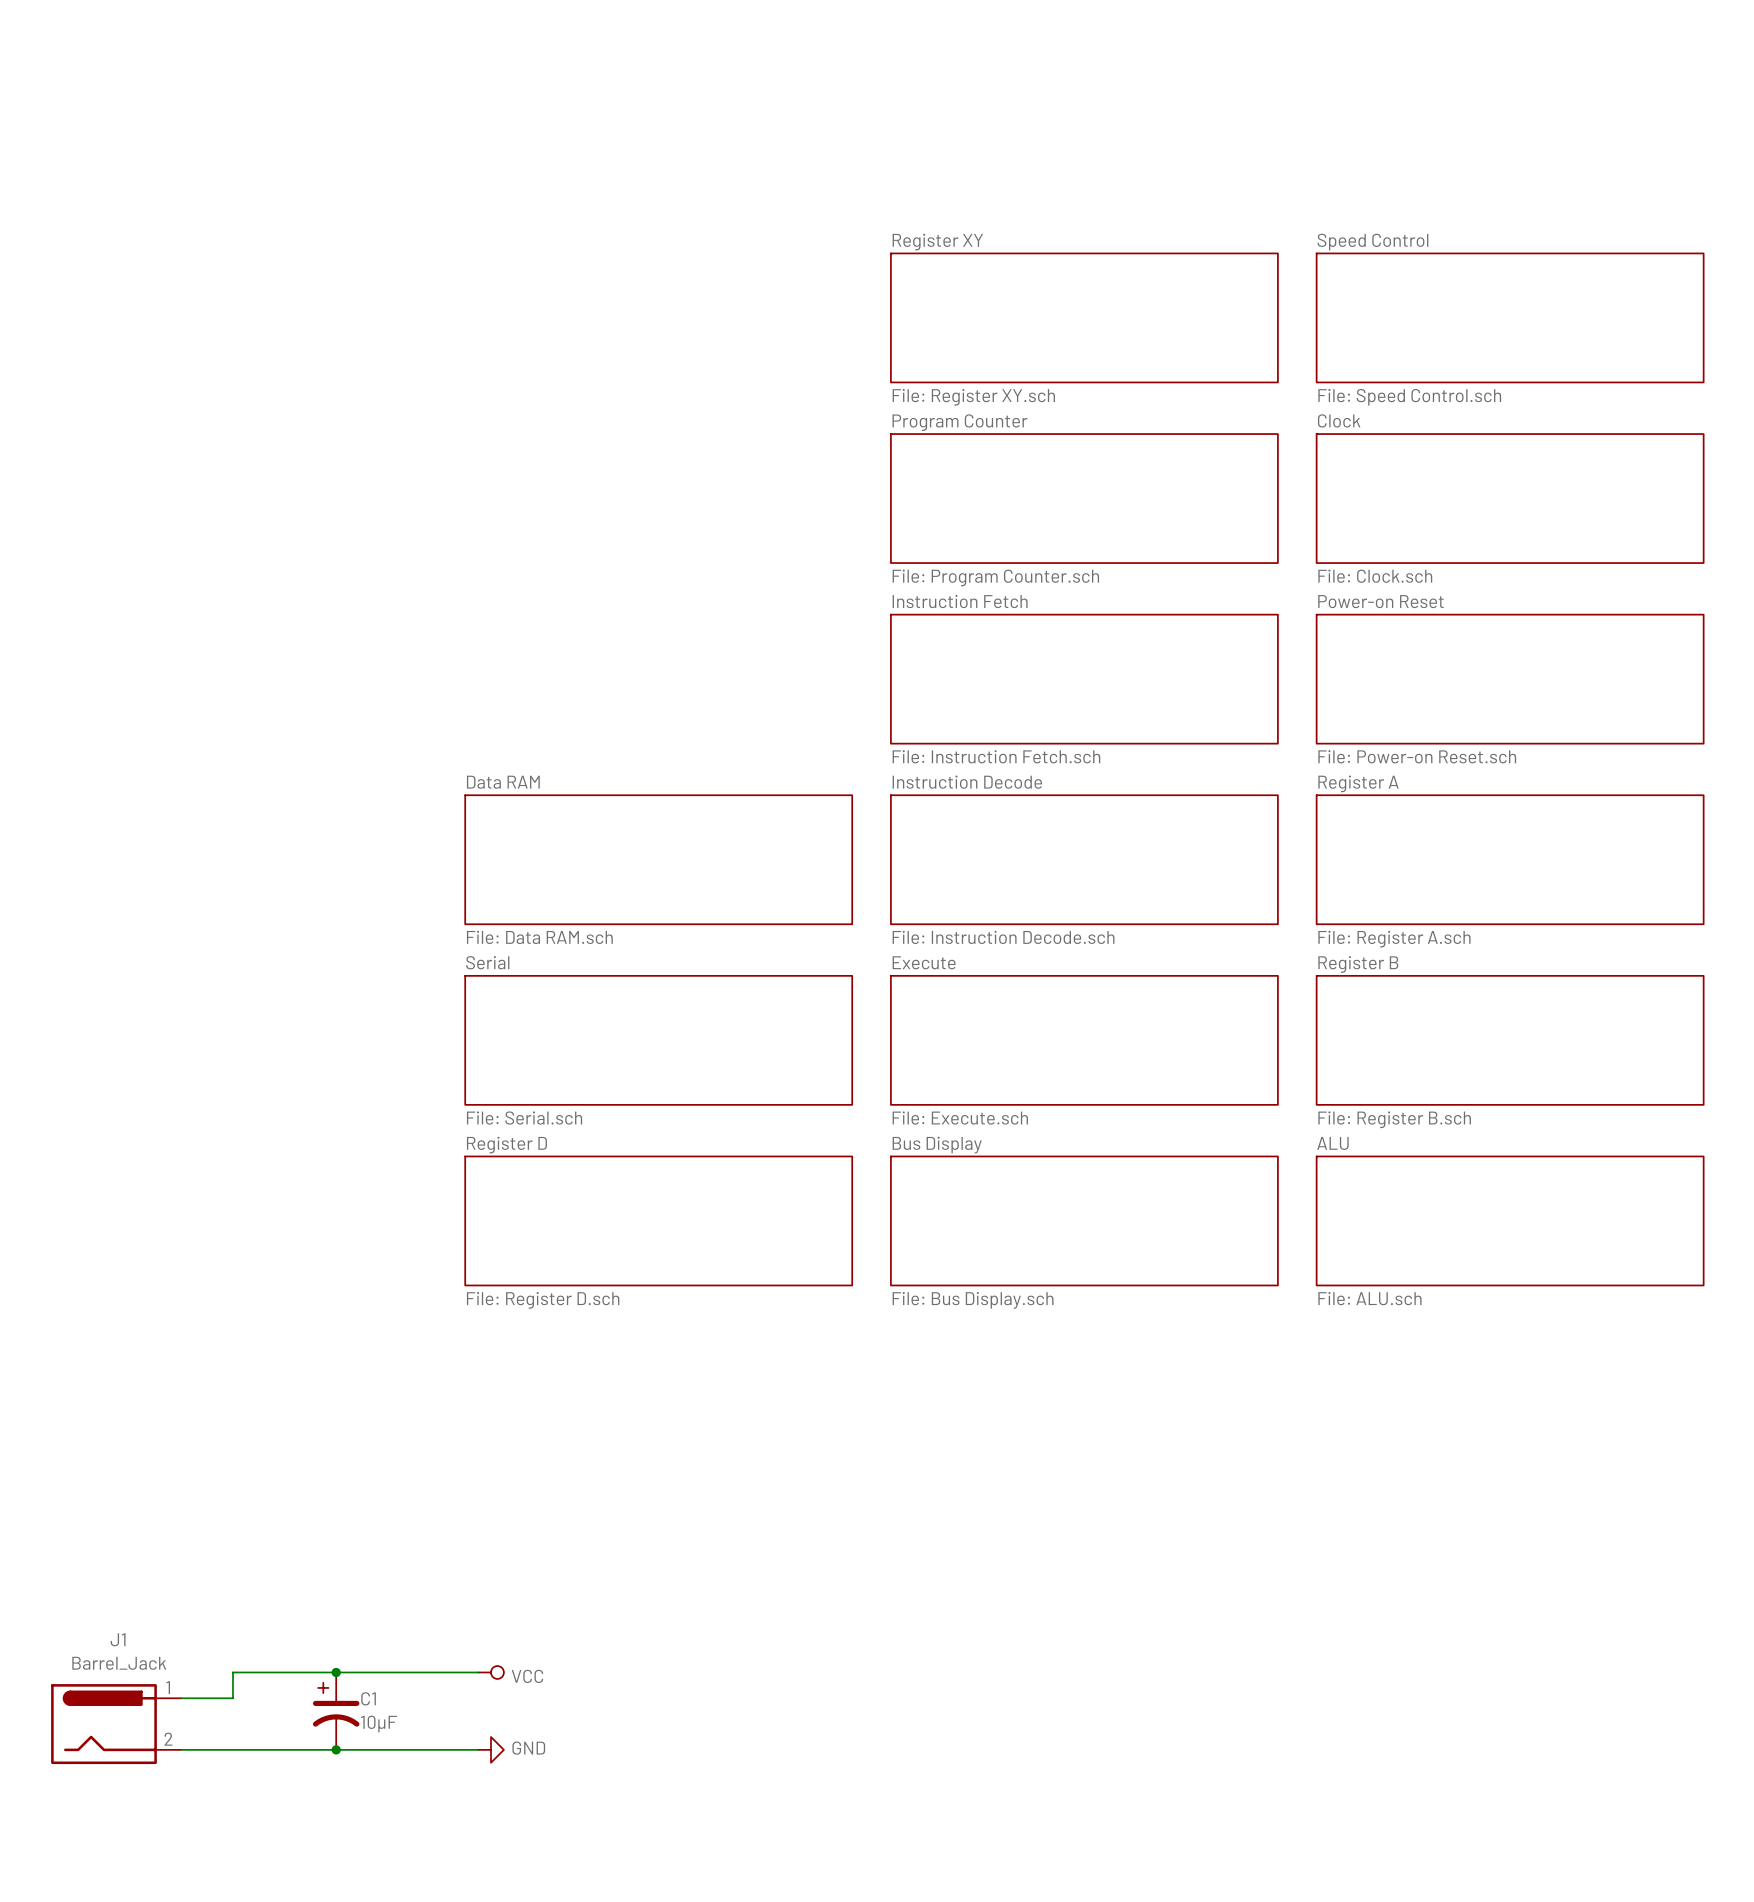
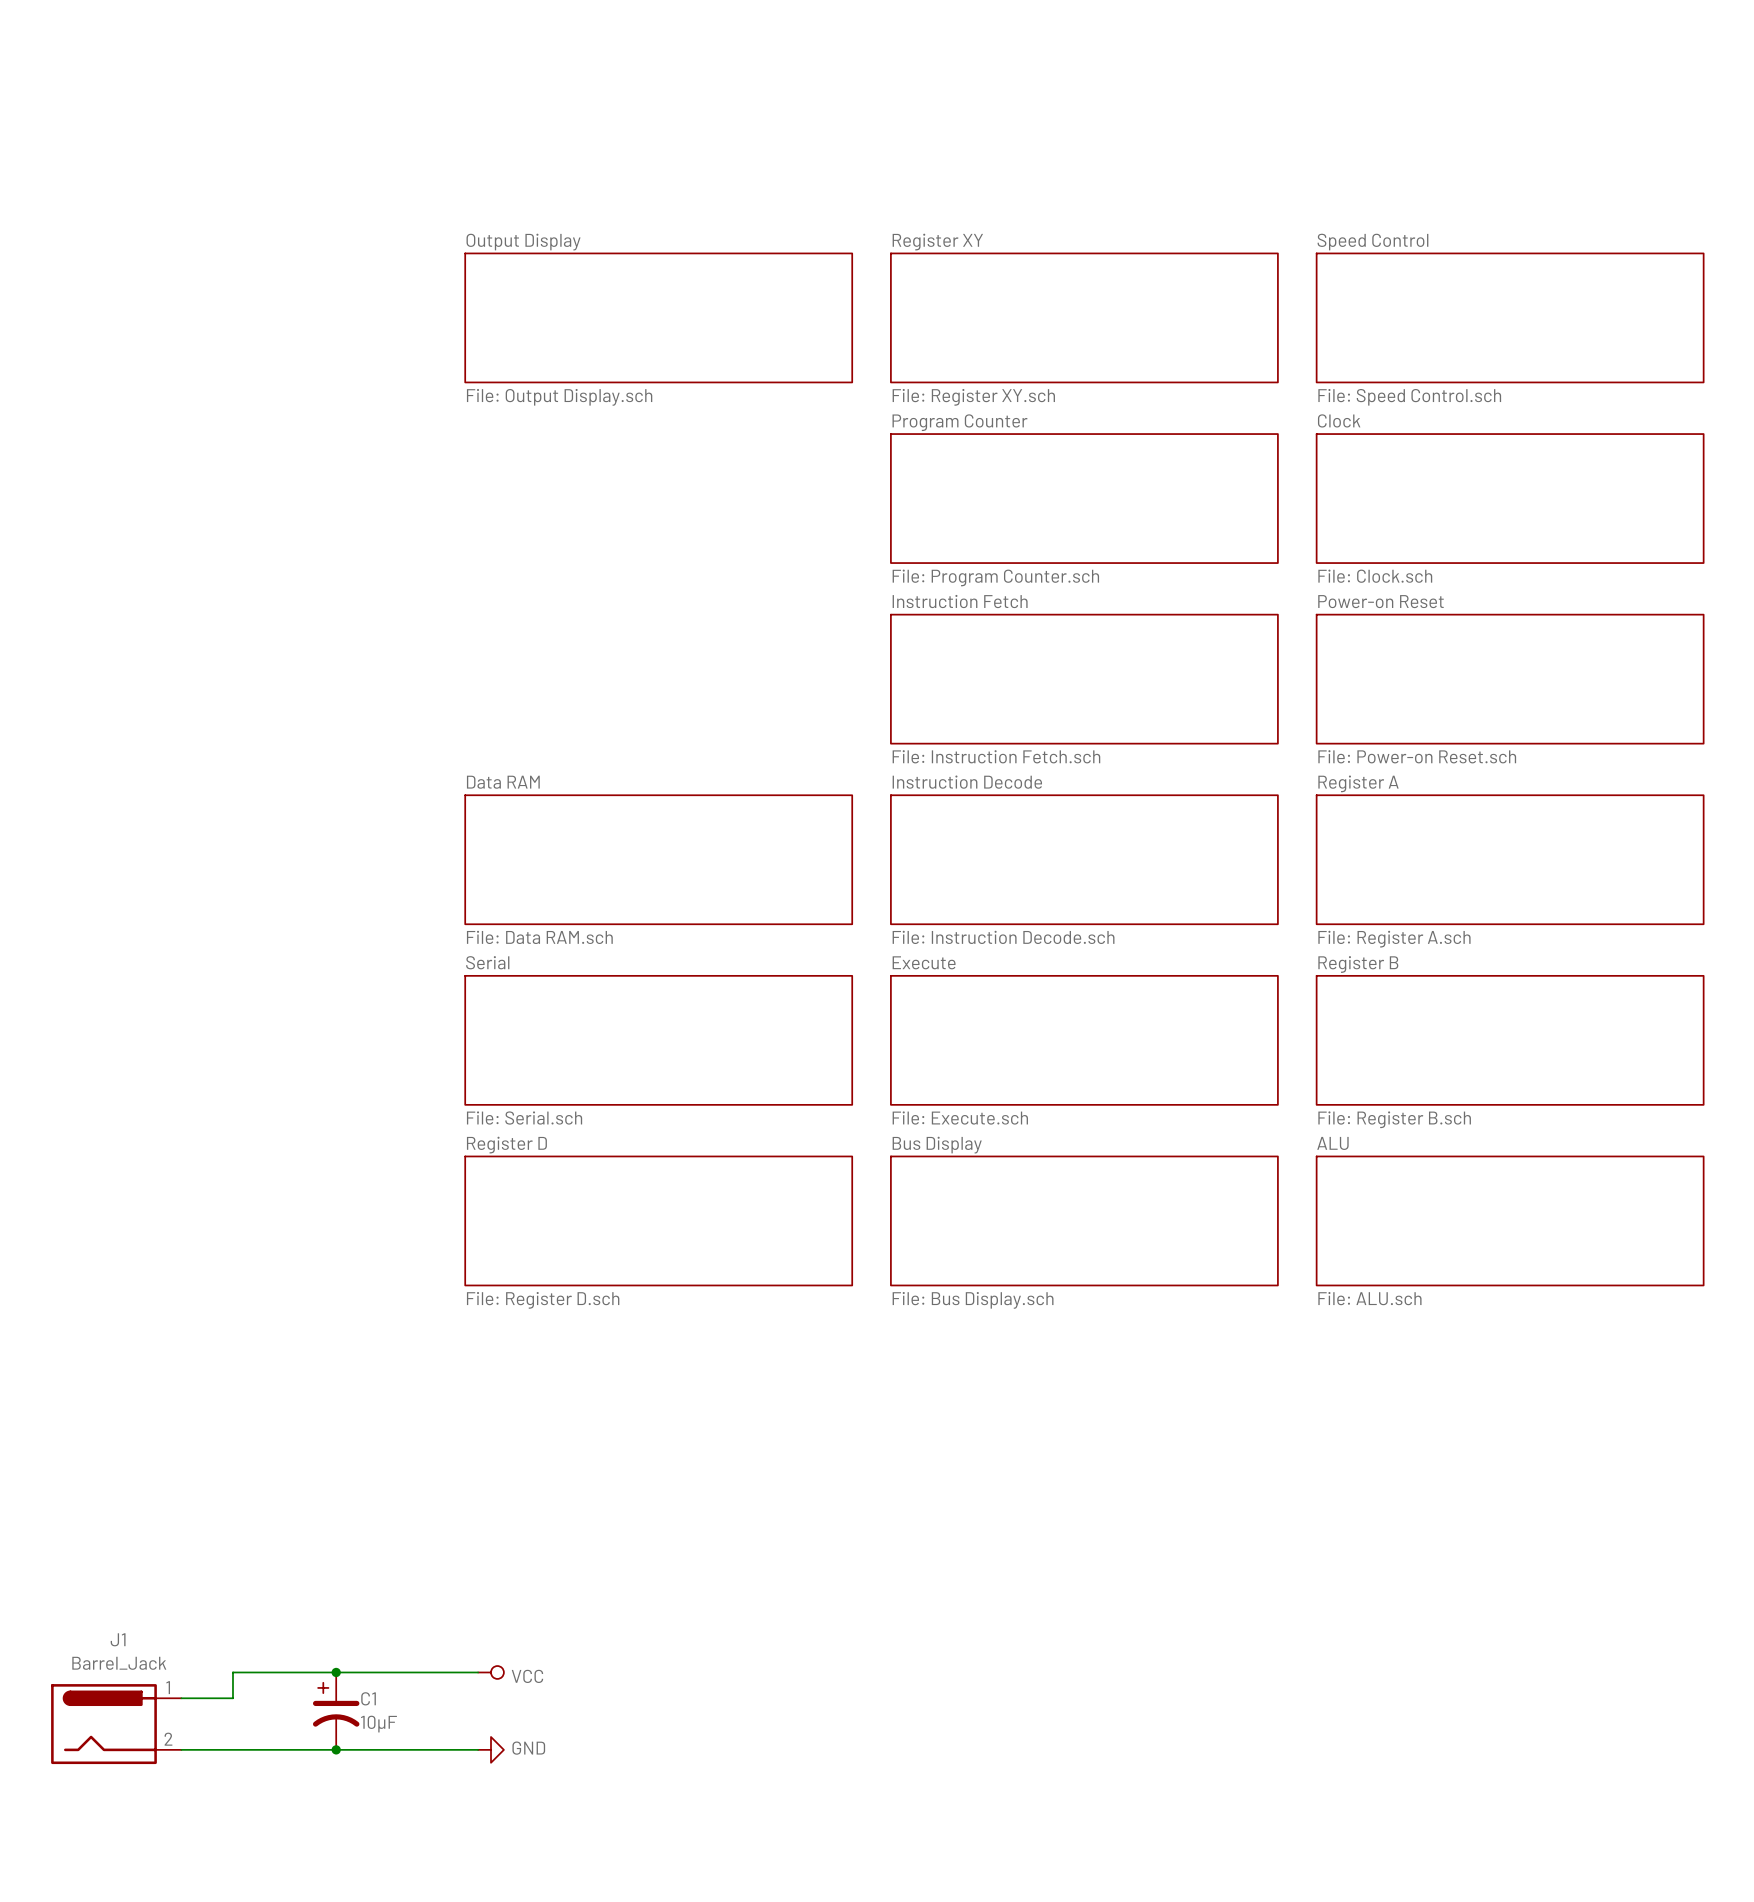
sheet Output Display: none -> File: Output Display.sch (658, 317)

